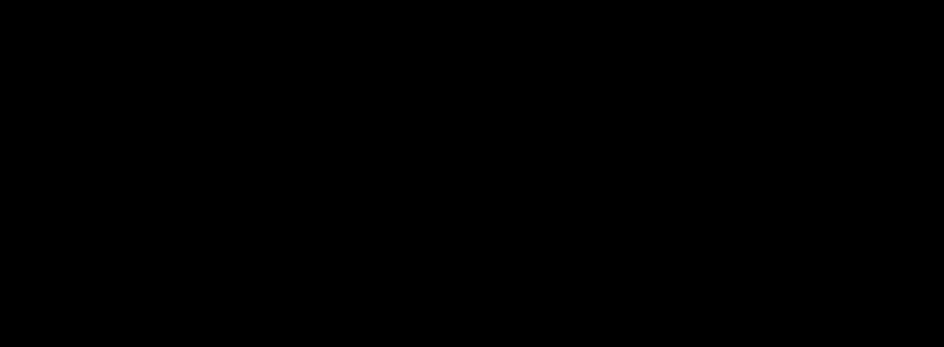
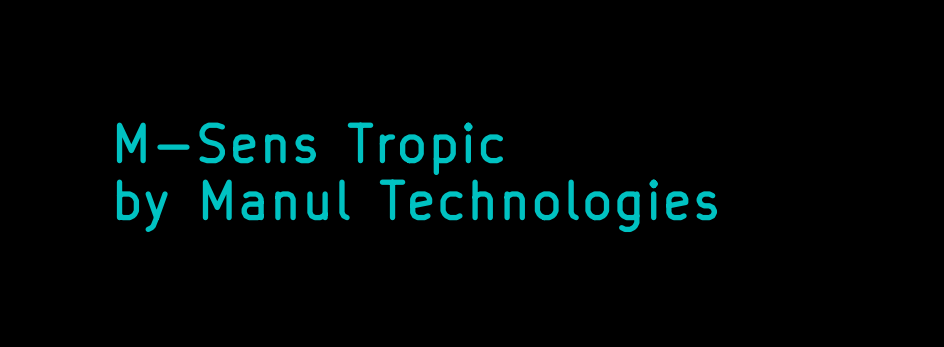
text: none -> M-Sens Tropic (309, 148)
text: none -> by Manul Technologies (416, 205)

